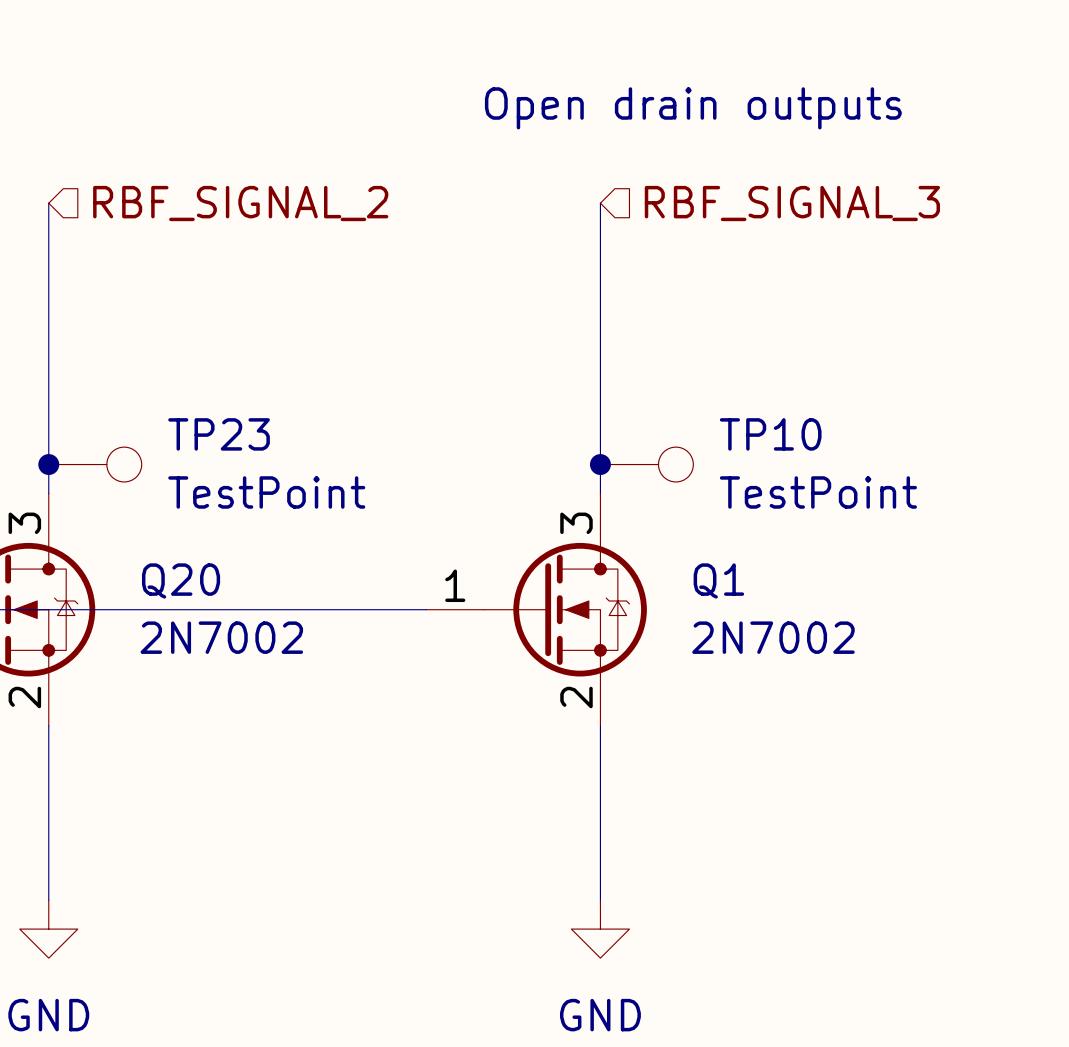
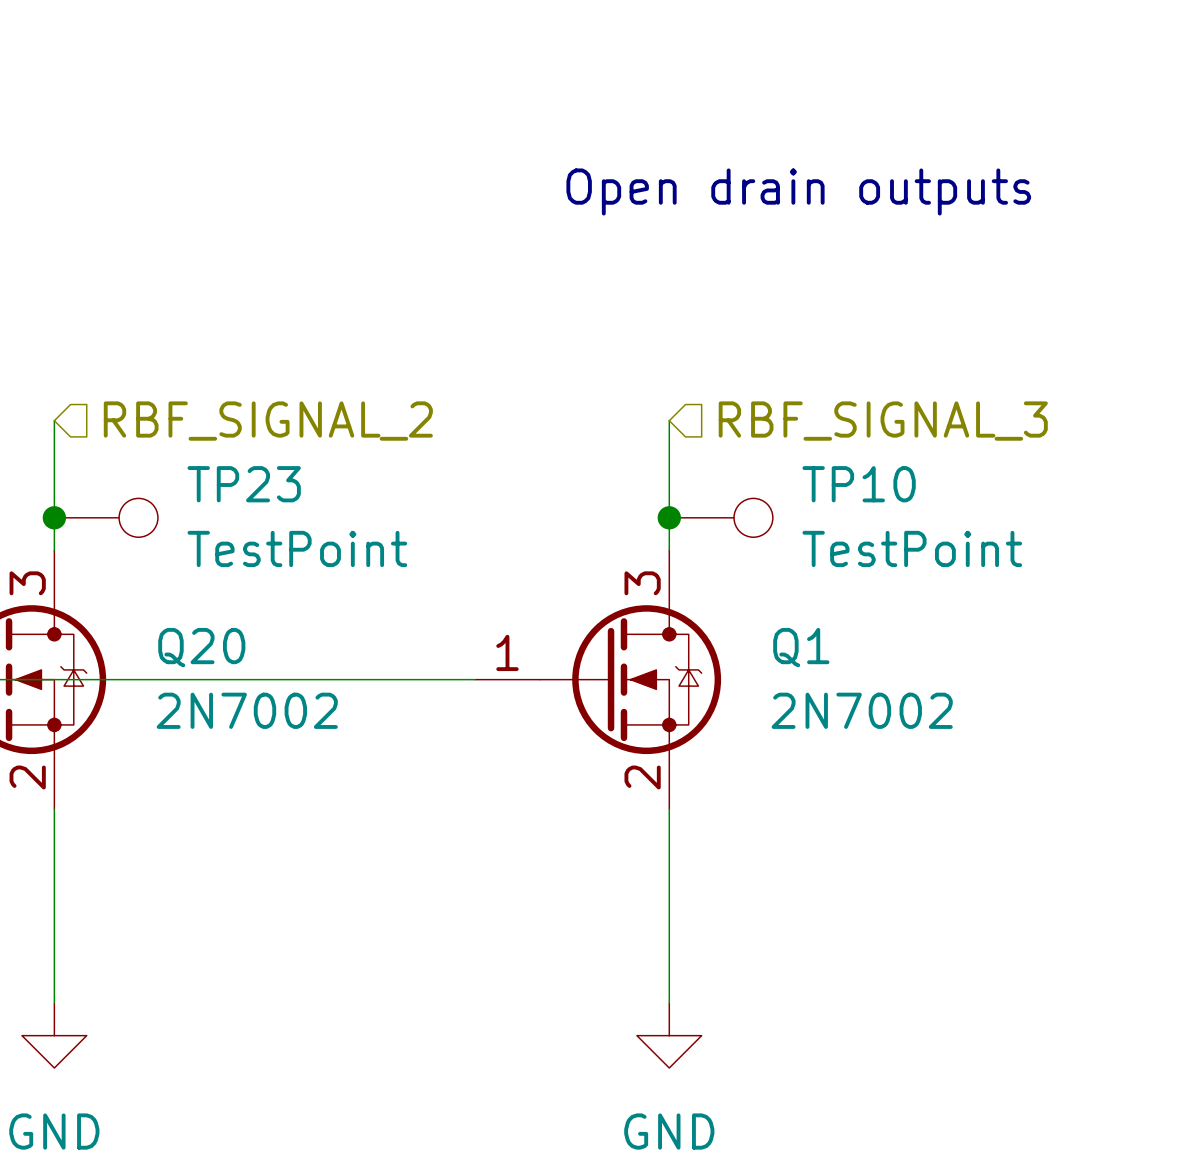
text position: Open drain outputs (693, 108) -> Open drain outputs (798, 191)
wire: (48, 203) (48, 377) -> none
hierarchical label position: RBF_SIGNAL_2 (240, 203) -> RBF_SIGNAL_2 (268, 421)
wire: (600, 203) (600, 377) -> none
hierarchical label position: RBF_SIGNAL_3 (792, 203) -> RBF_SIGNAL_3 (883, 421)

